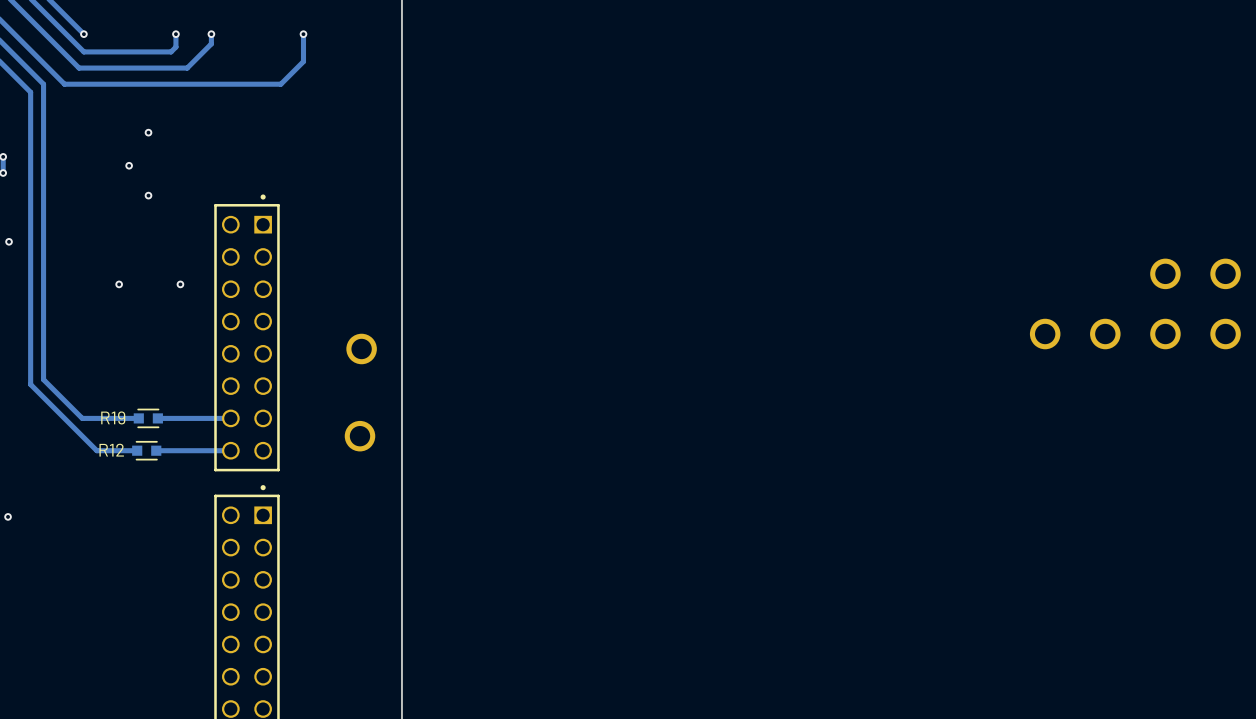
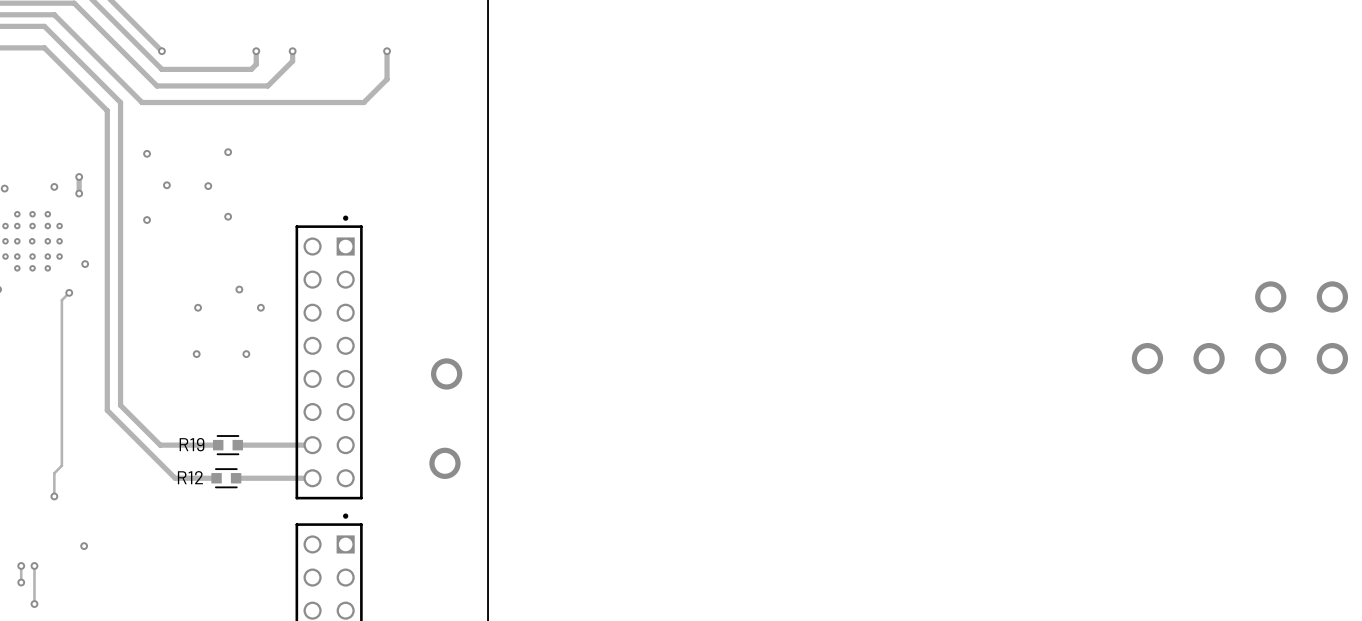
via: none -> (147, 153)
via: none -> (166, 185)
via: none -> (147, 220)
via: none -> (239, 289)
via: none -> (196, 354)
via: none -> (246, 354)

